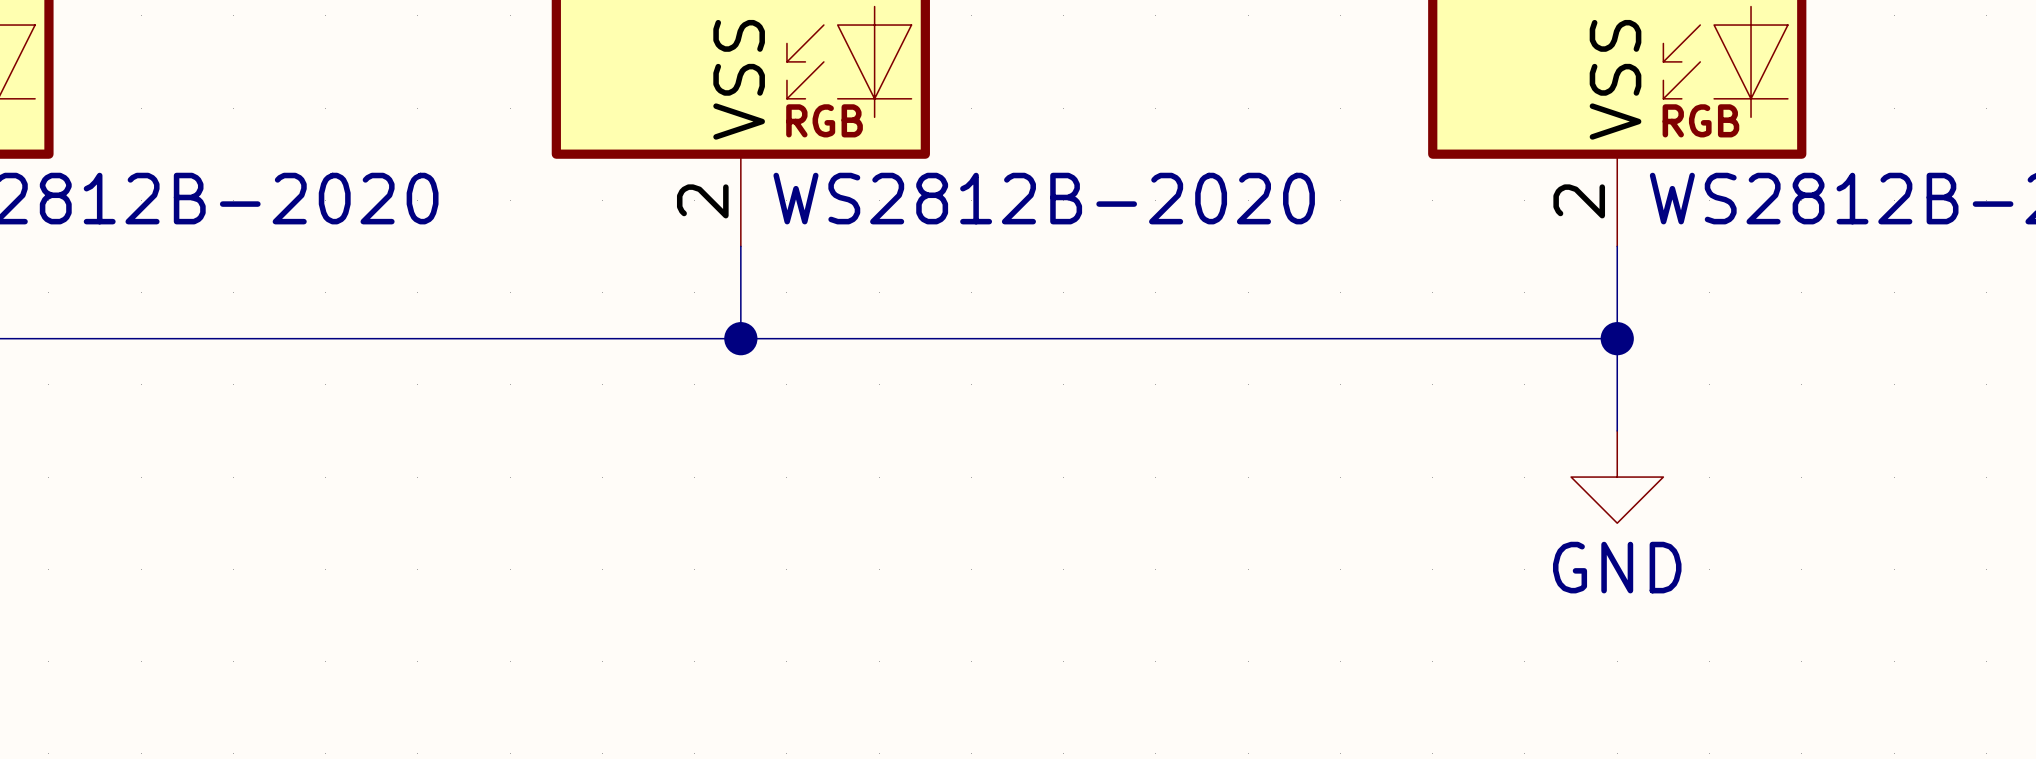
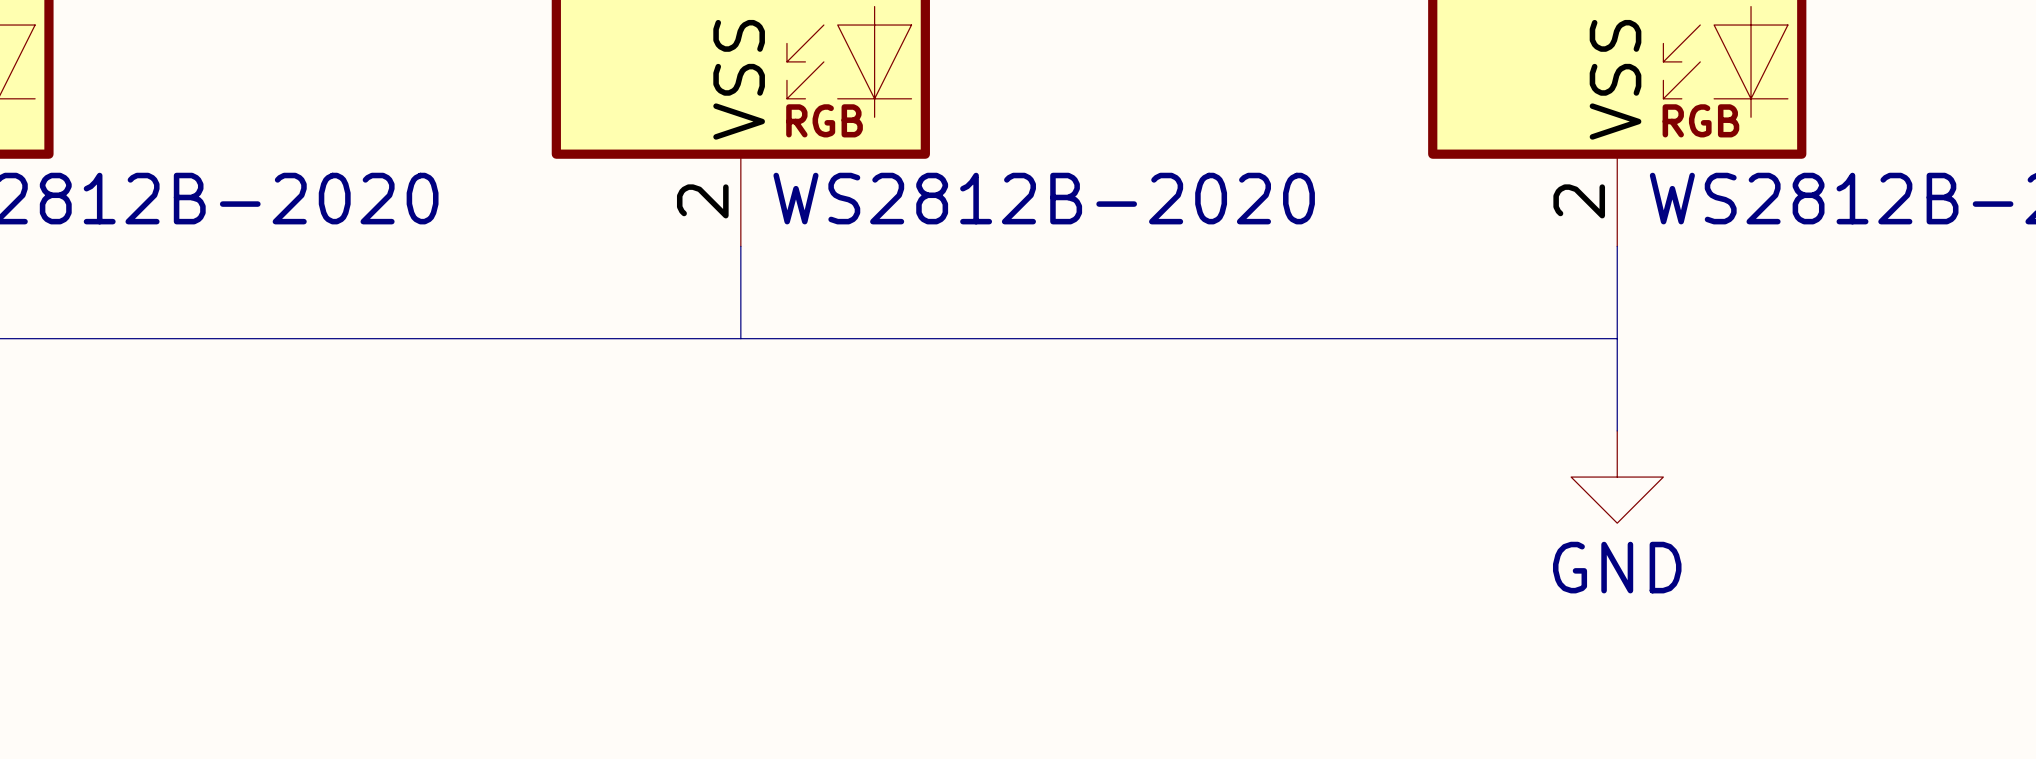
junction: (740, 338) -> none
junction: (1617, 338) -> none

